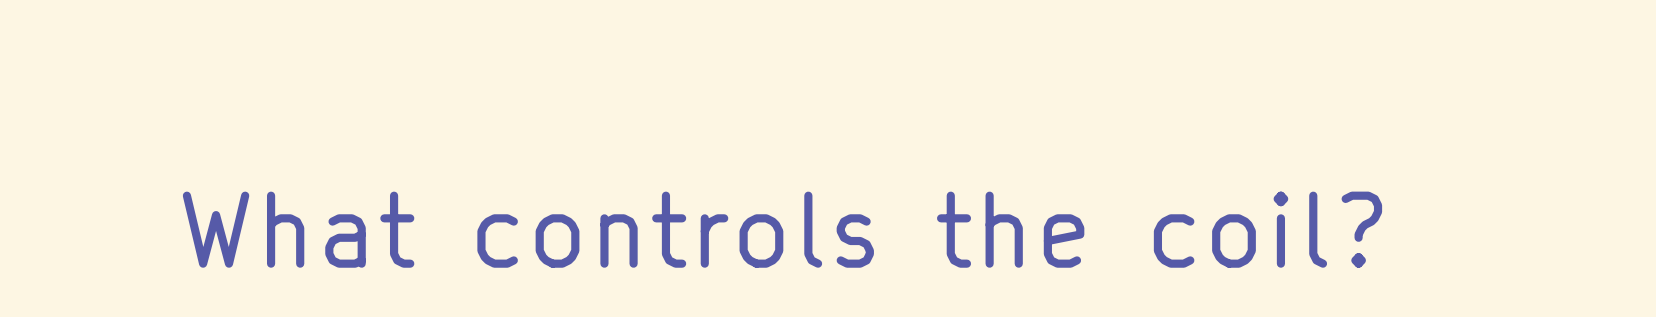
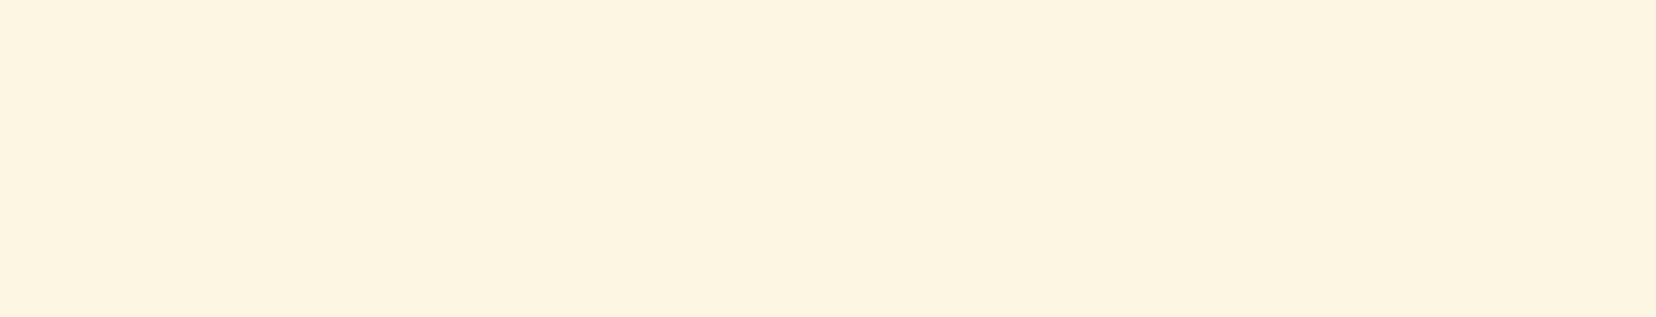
text: What controls the coil? (782, 229) -> none

